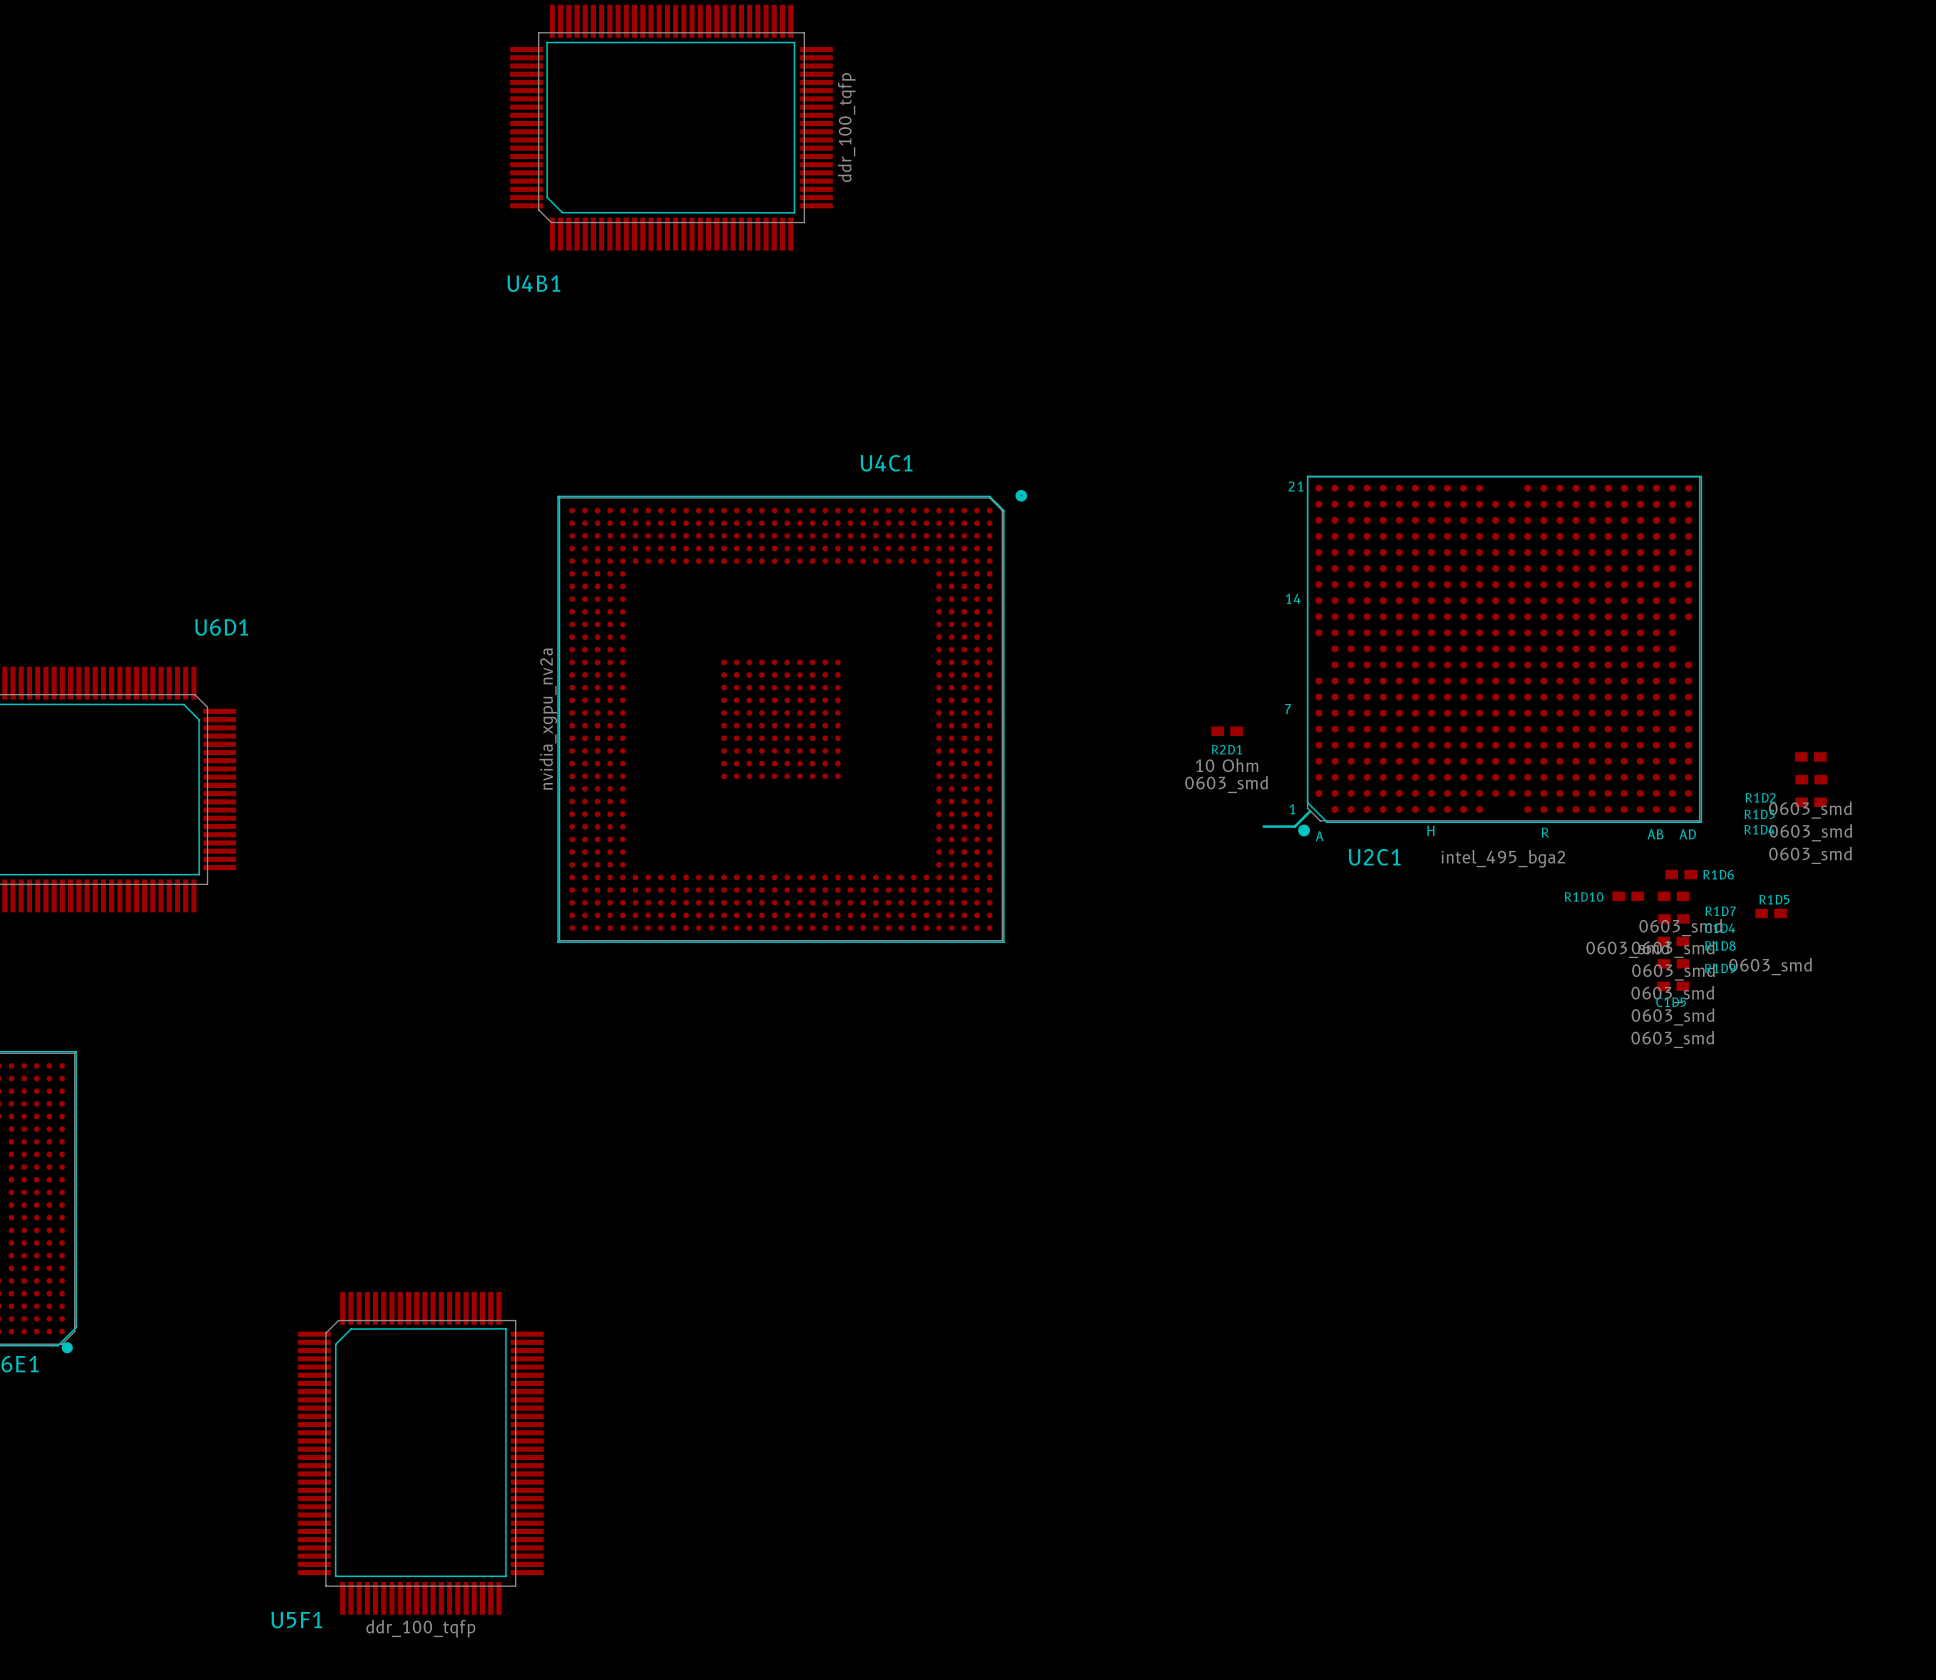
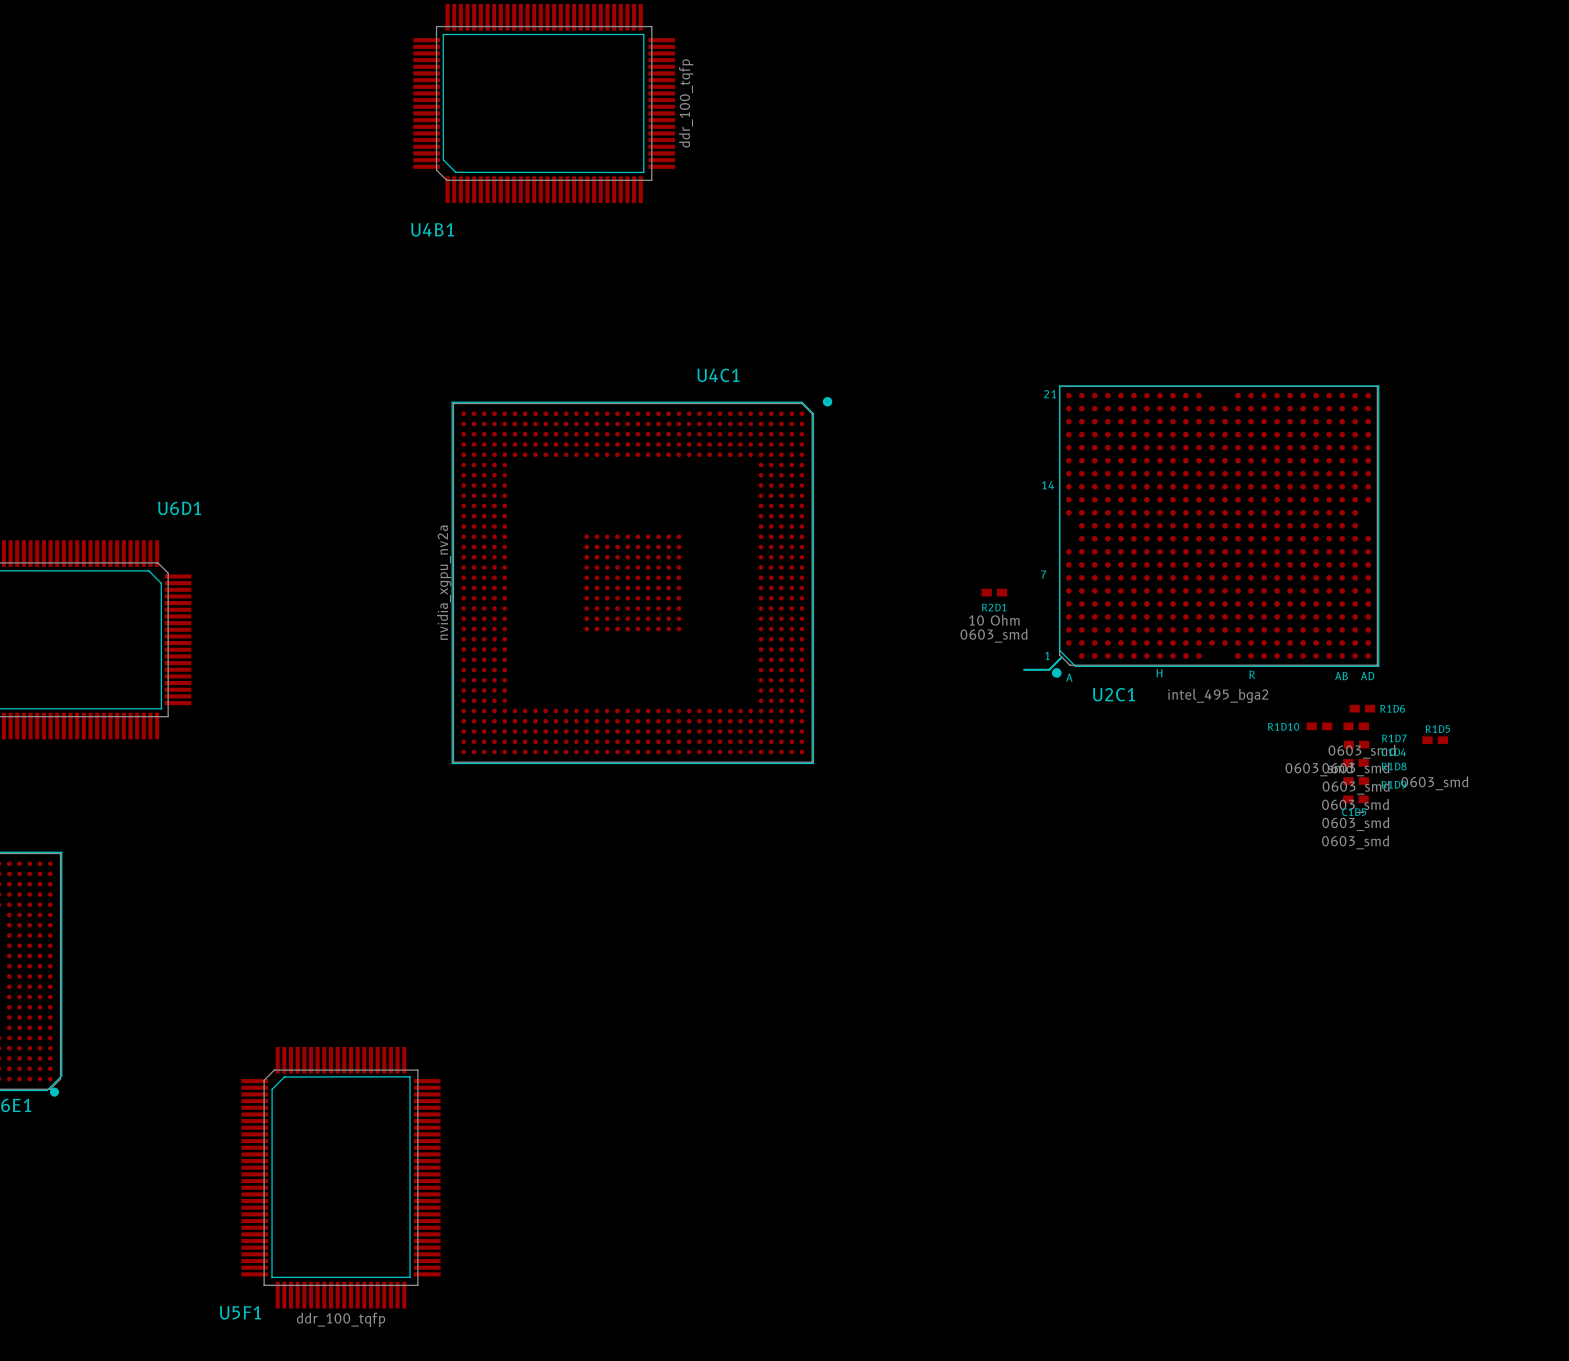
R1D2: 0603_smd (1810, 756) -> none
R1D3: 0603_smd (1811, 779) -> none
R1D4: 0603_smd (1810, 802) -> none

